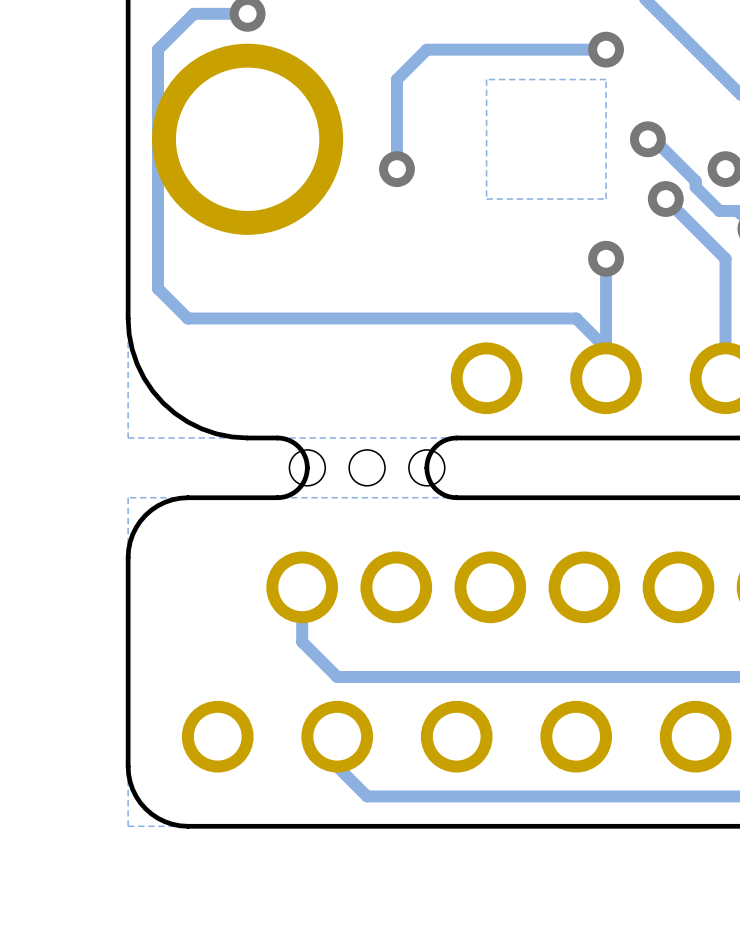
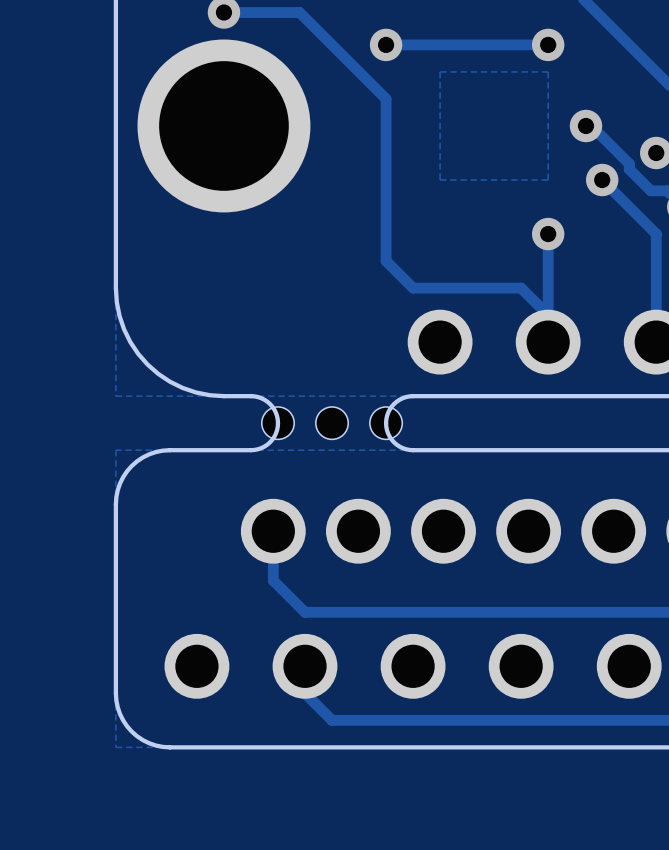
track: (247, 13) (193, 13) (158, 49) (158, 288) (187, 318) (456, 318) -> (223, 12) (299, 12) (386, 98) (386, 261) (413, 288)
track: (426, 49) (396, 79) (396, 169) -> none
via position: (396, 169) -> (386, 44)

